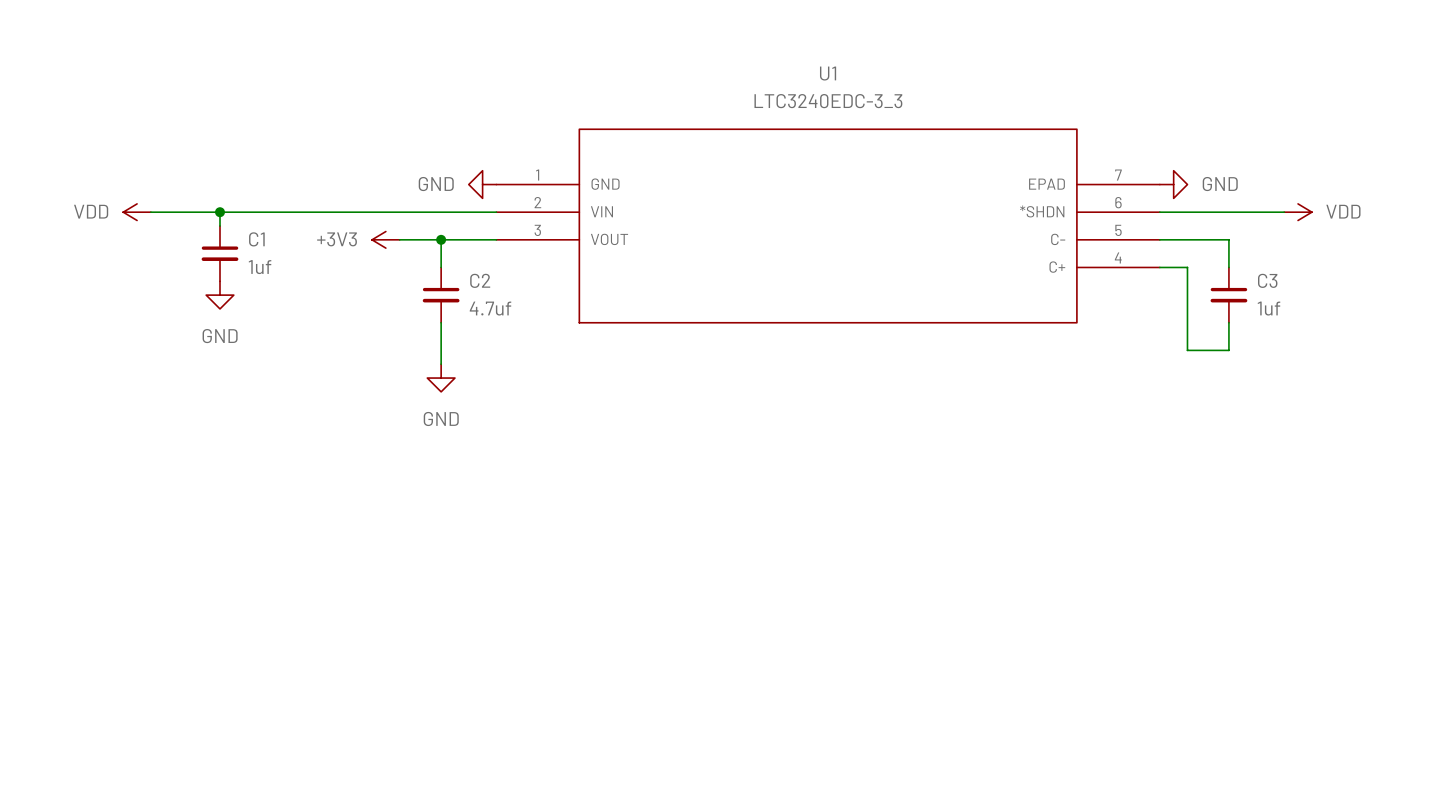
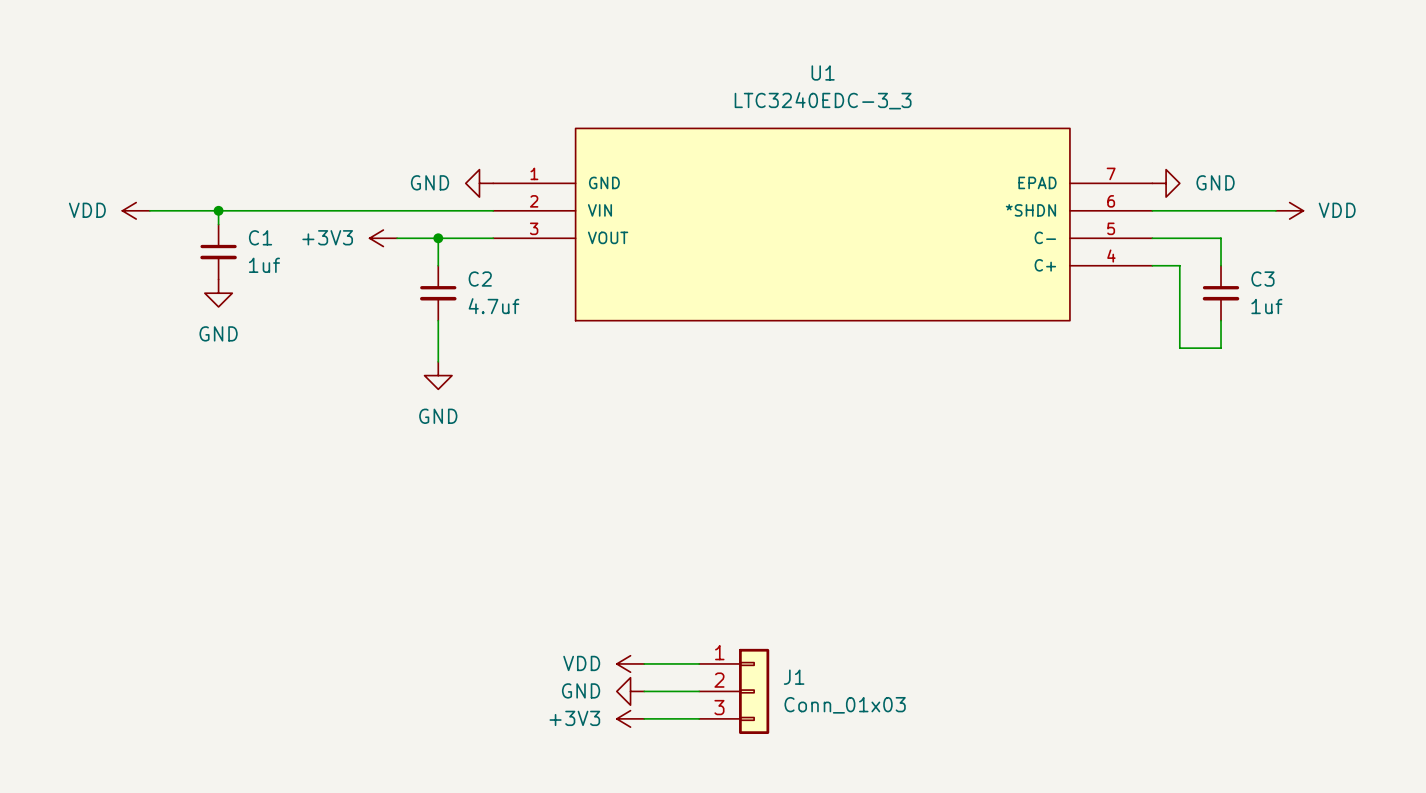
power symbol: none -> VDD (630, 663)
wire: none -> (644, 663) (699, 663)
power symbol: none -> GND (630, 691)
wire: none -> (644, 691) (699, 691)
J1: none -> Conn_01x03 (734, 691)
power symbol: none -> +3V3 (630, 718)
wire: none -> (644, 718) (699, 718)

